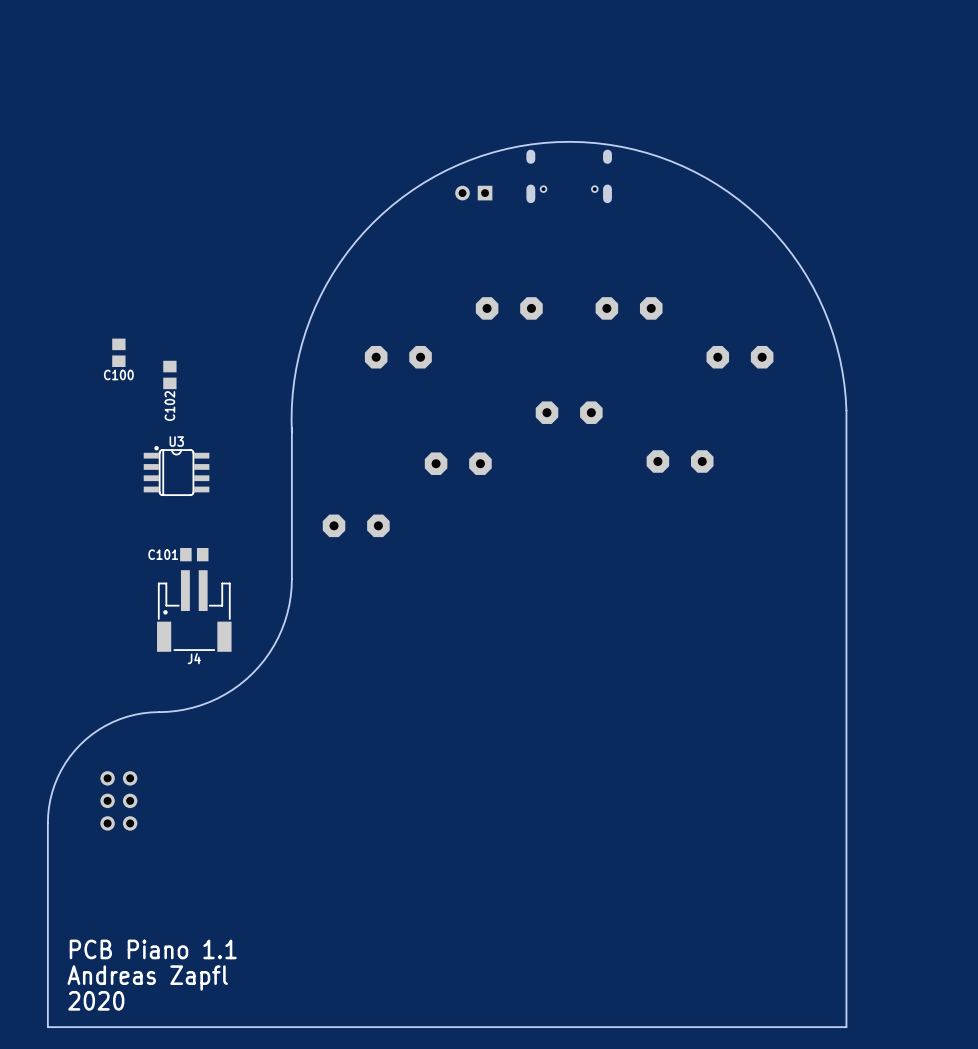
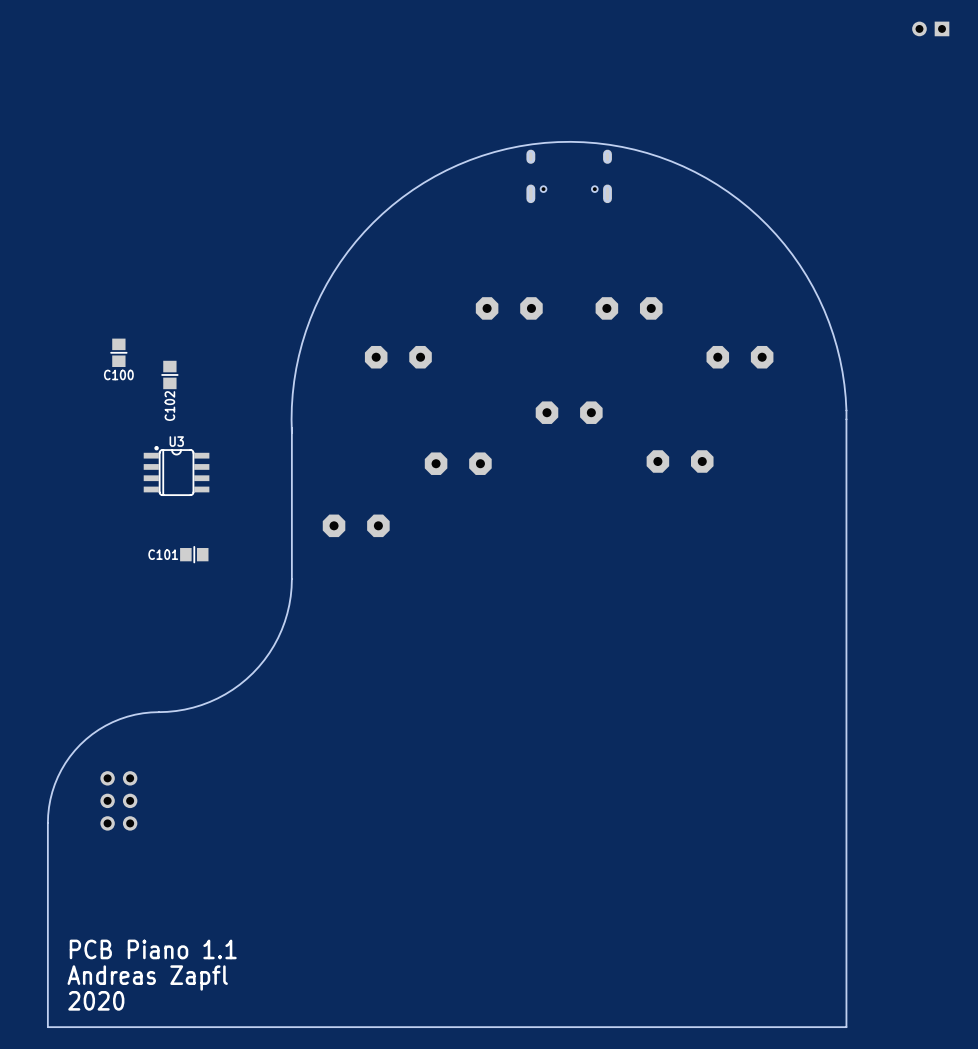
part: none -> (930, 28)
part: (473, 193) -> none
C100 footprint: [112, 338, 126, 367] -> [110, 338, 128, 367]
C102 footprint: [163, 360, 177, 390] -> [161, 360, 179, 390]
C101 footprint: [180, 548, 209, 562] -> [180, 546, 209, 563]
J4: (194, 611) -> none

